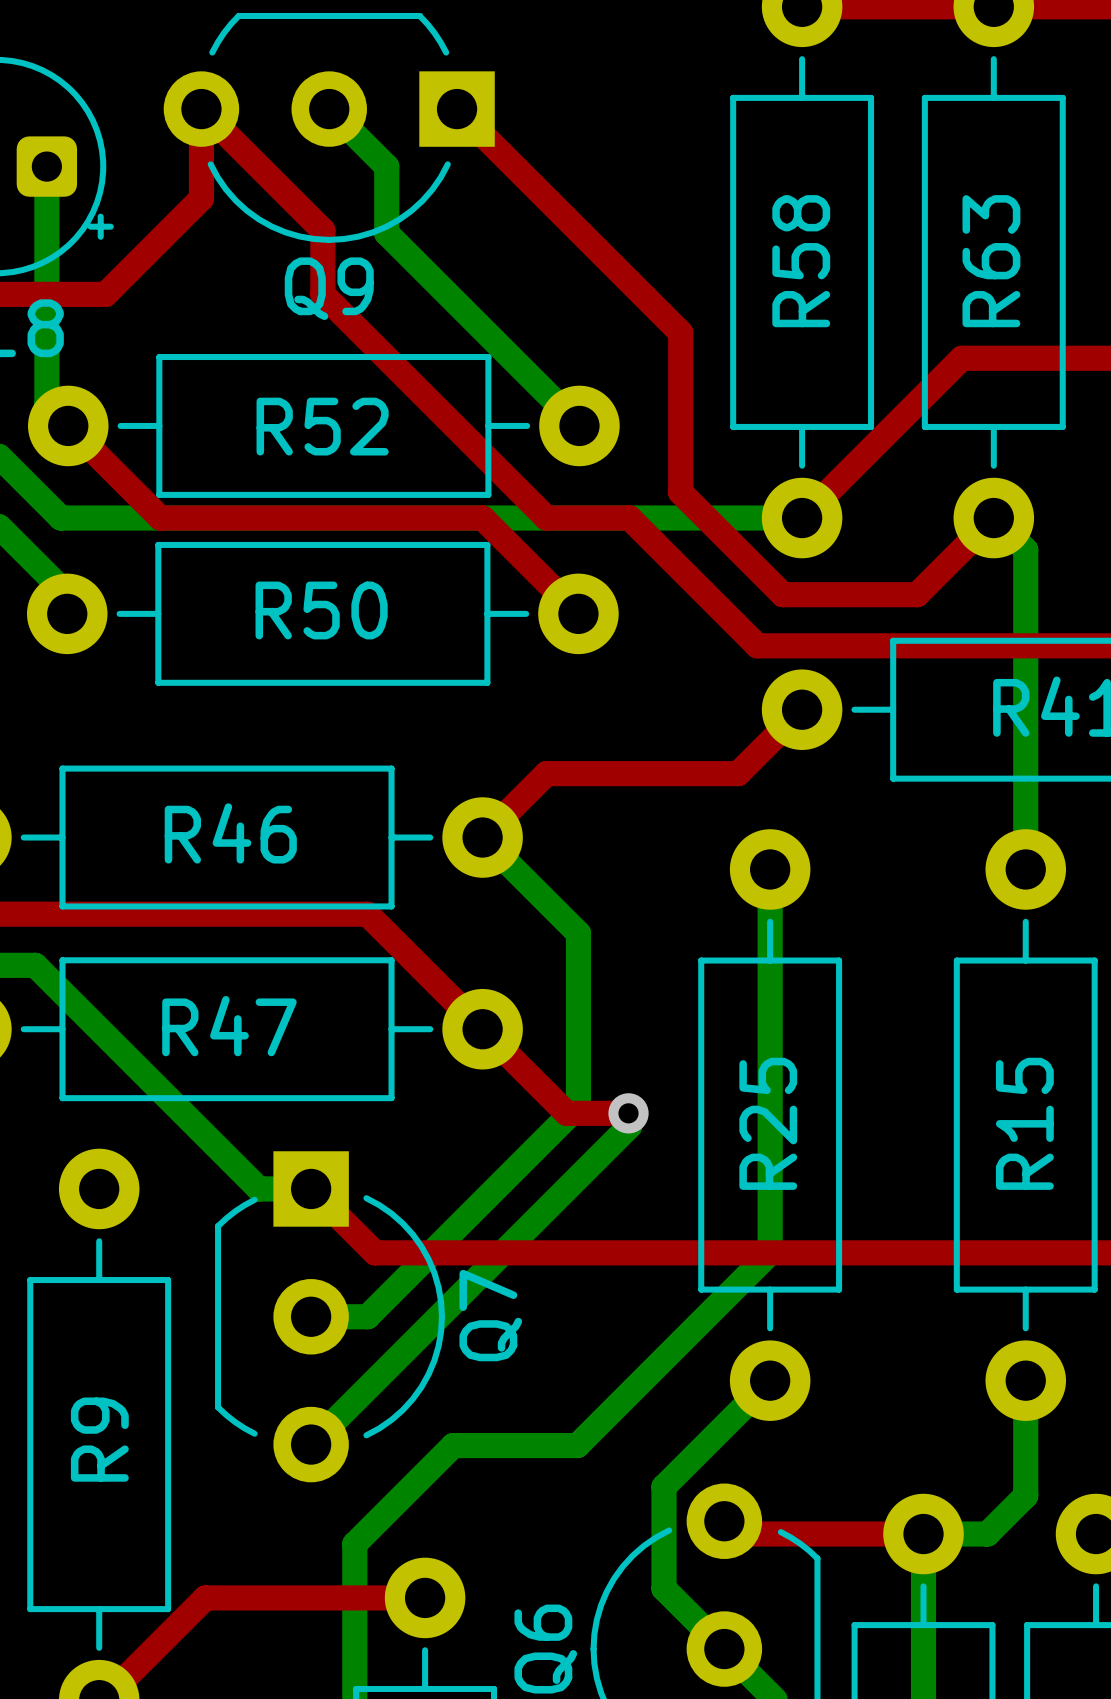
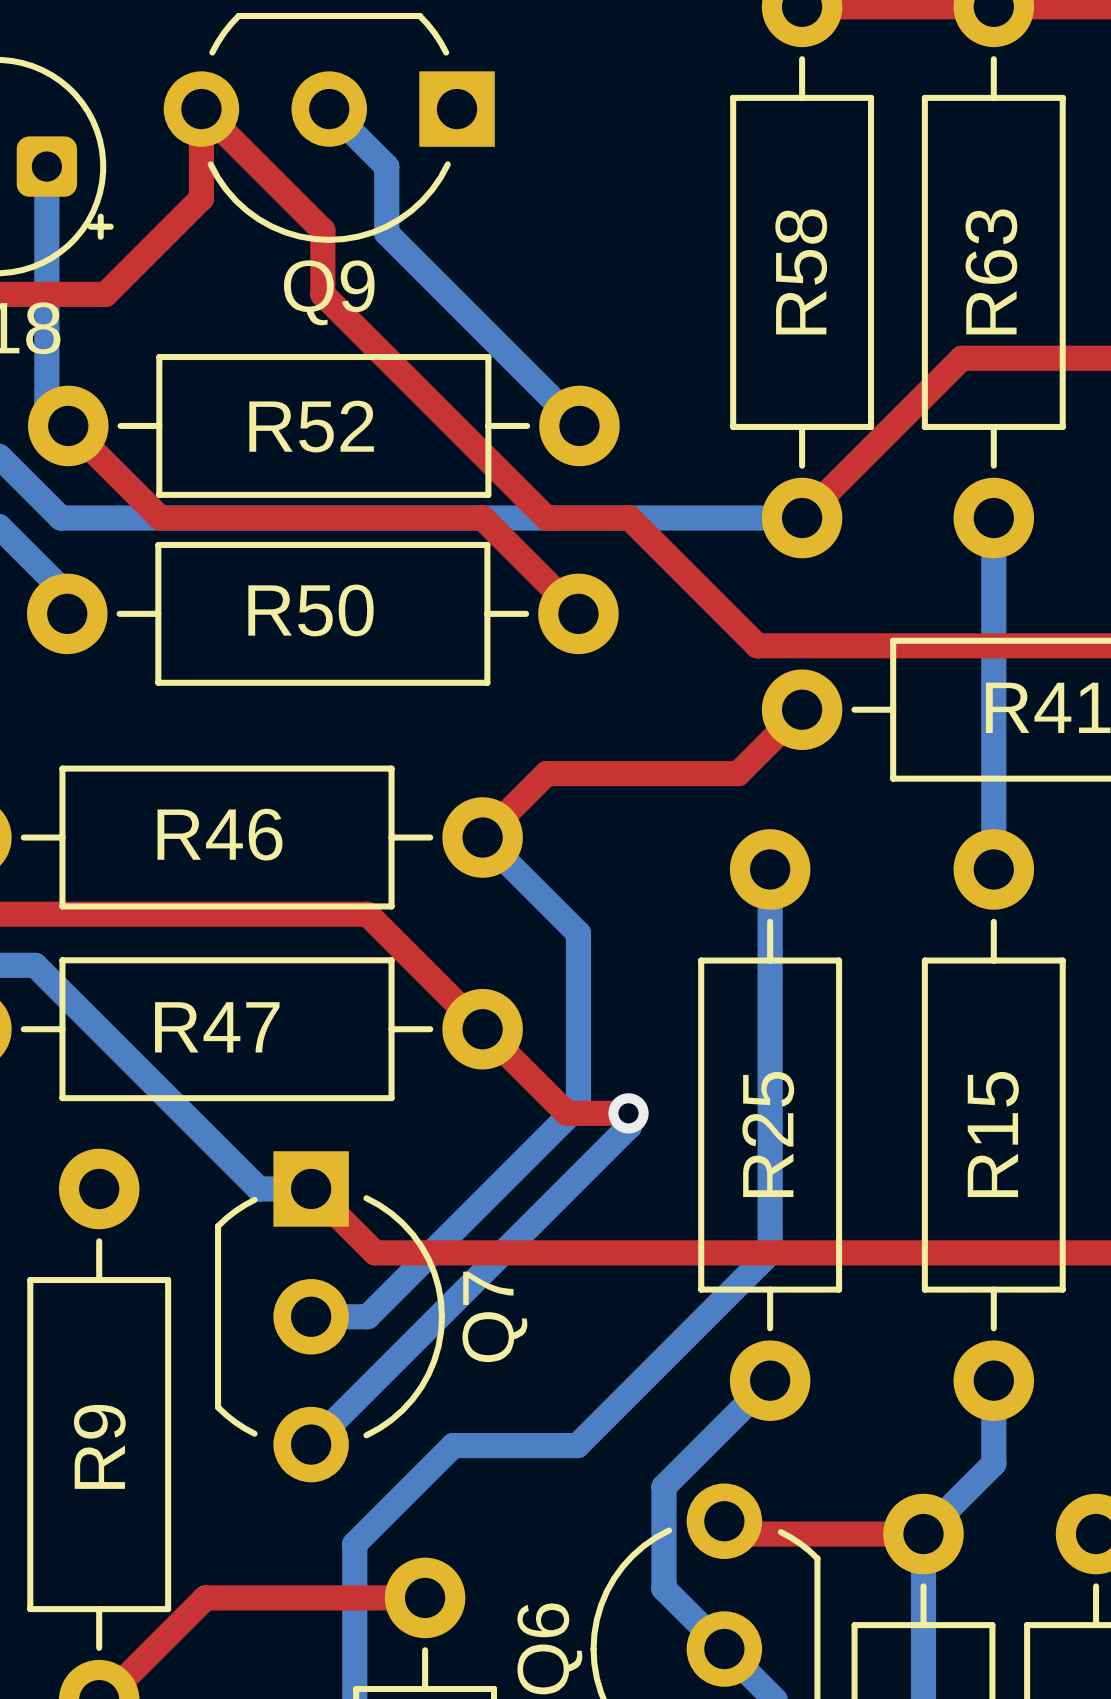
top track: (457, 109) (680, 332) (680, 492) (782, 594) (917, 594) (993, 518) -> none
bottom track: (993, 518) (1025, 549) (1025, 869) -> (993, 518) (993, 869)
R15 position: (1025, 1125) -> (993, 1125)
bottom track: (1025, 1380) (1025, 1495) (987, 1534) (923, 1534) -> (993, 1380) (993, 1463) (923, 1534)

